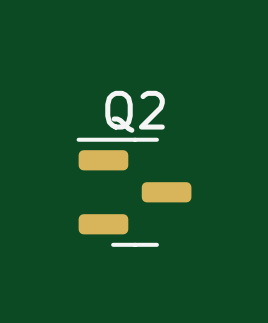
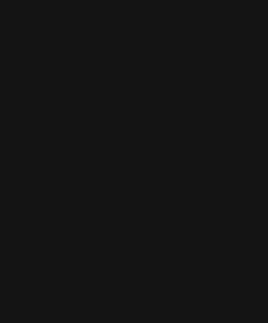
Q2: (134, 192) -> none

